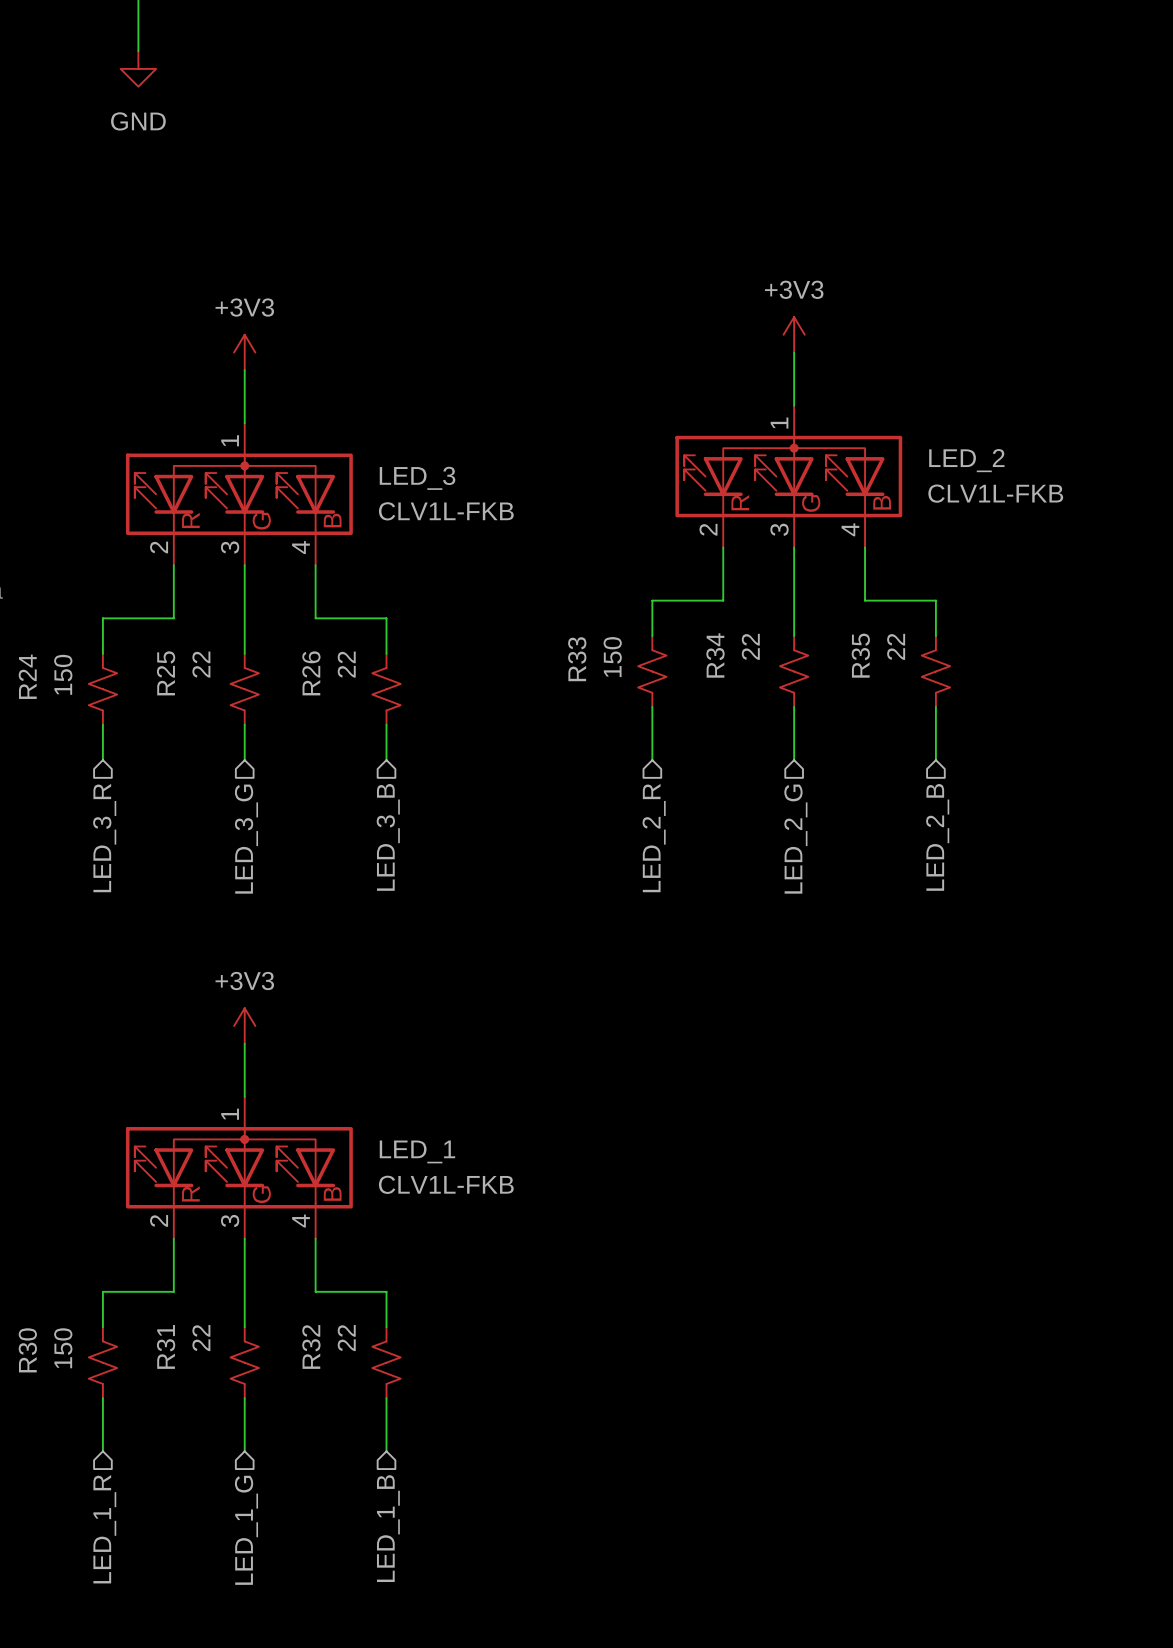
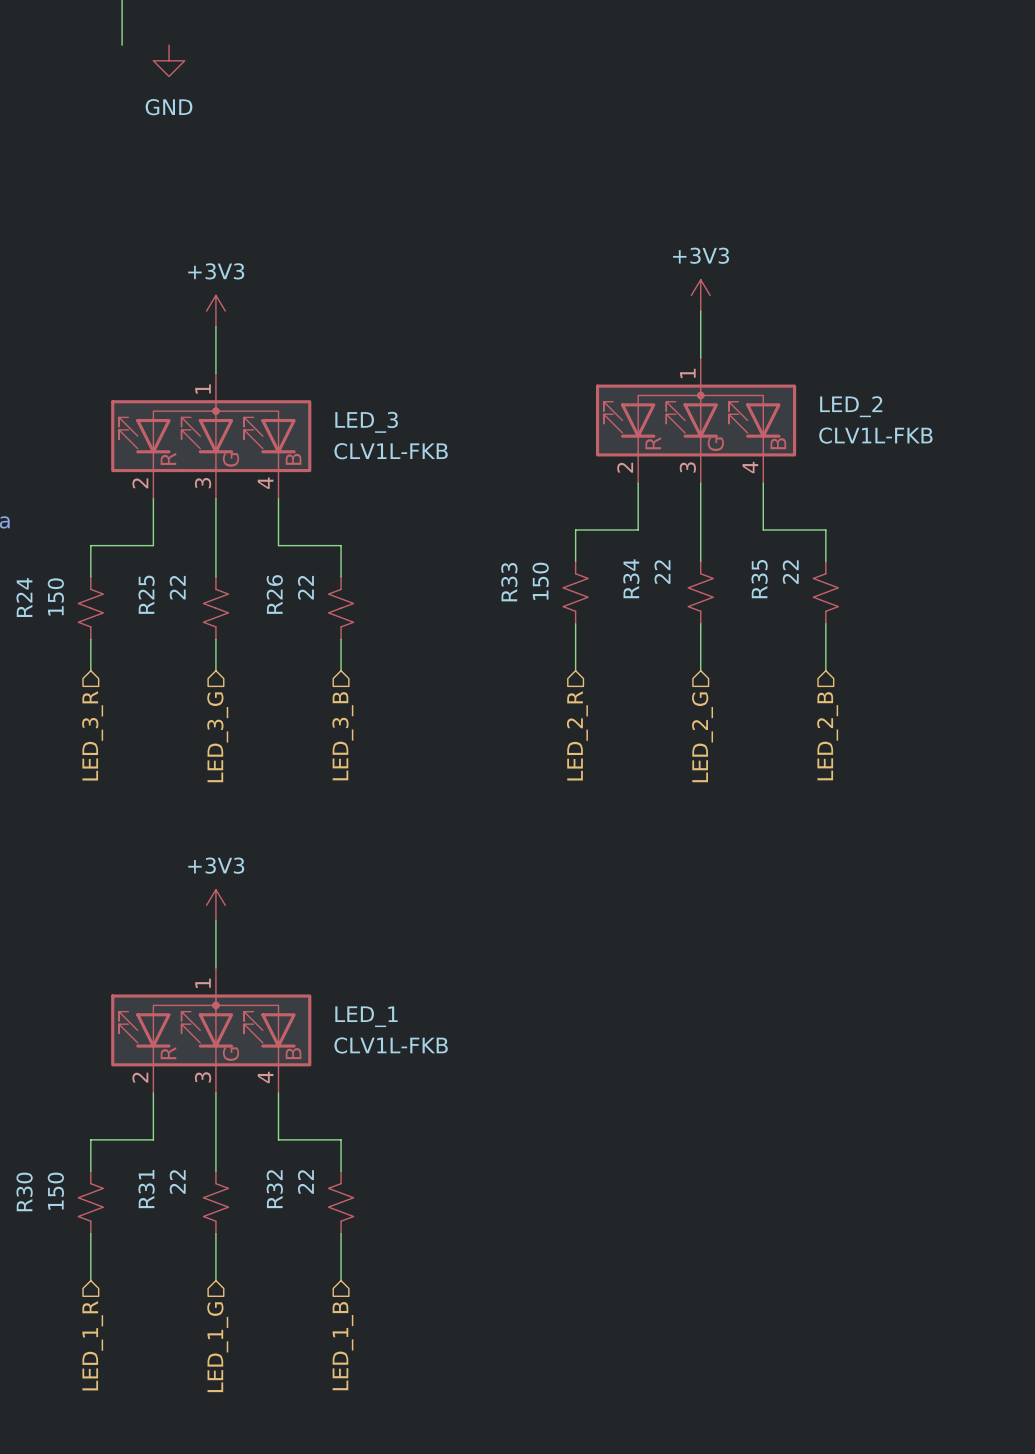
power symbol position: GND (138, 68) -> GND (169, 60)

